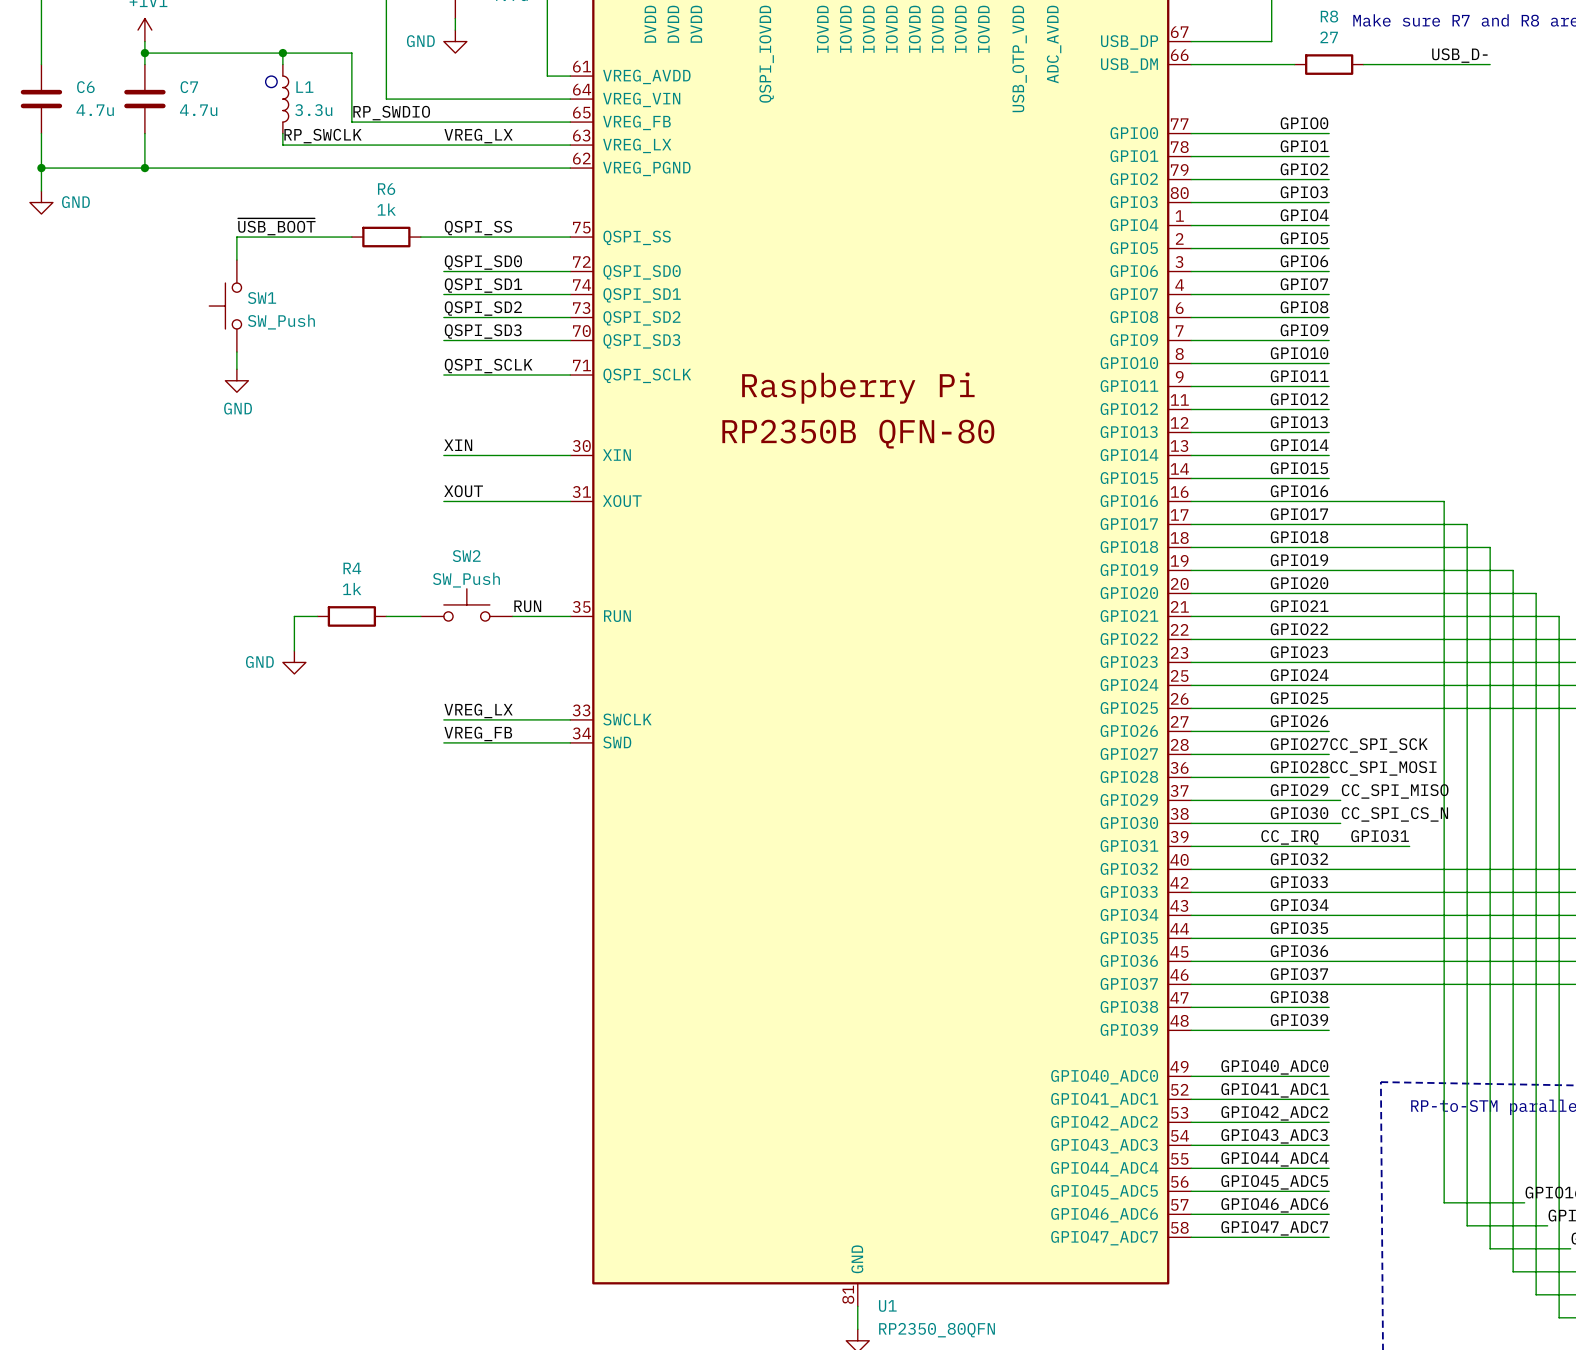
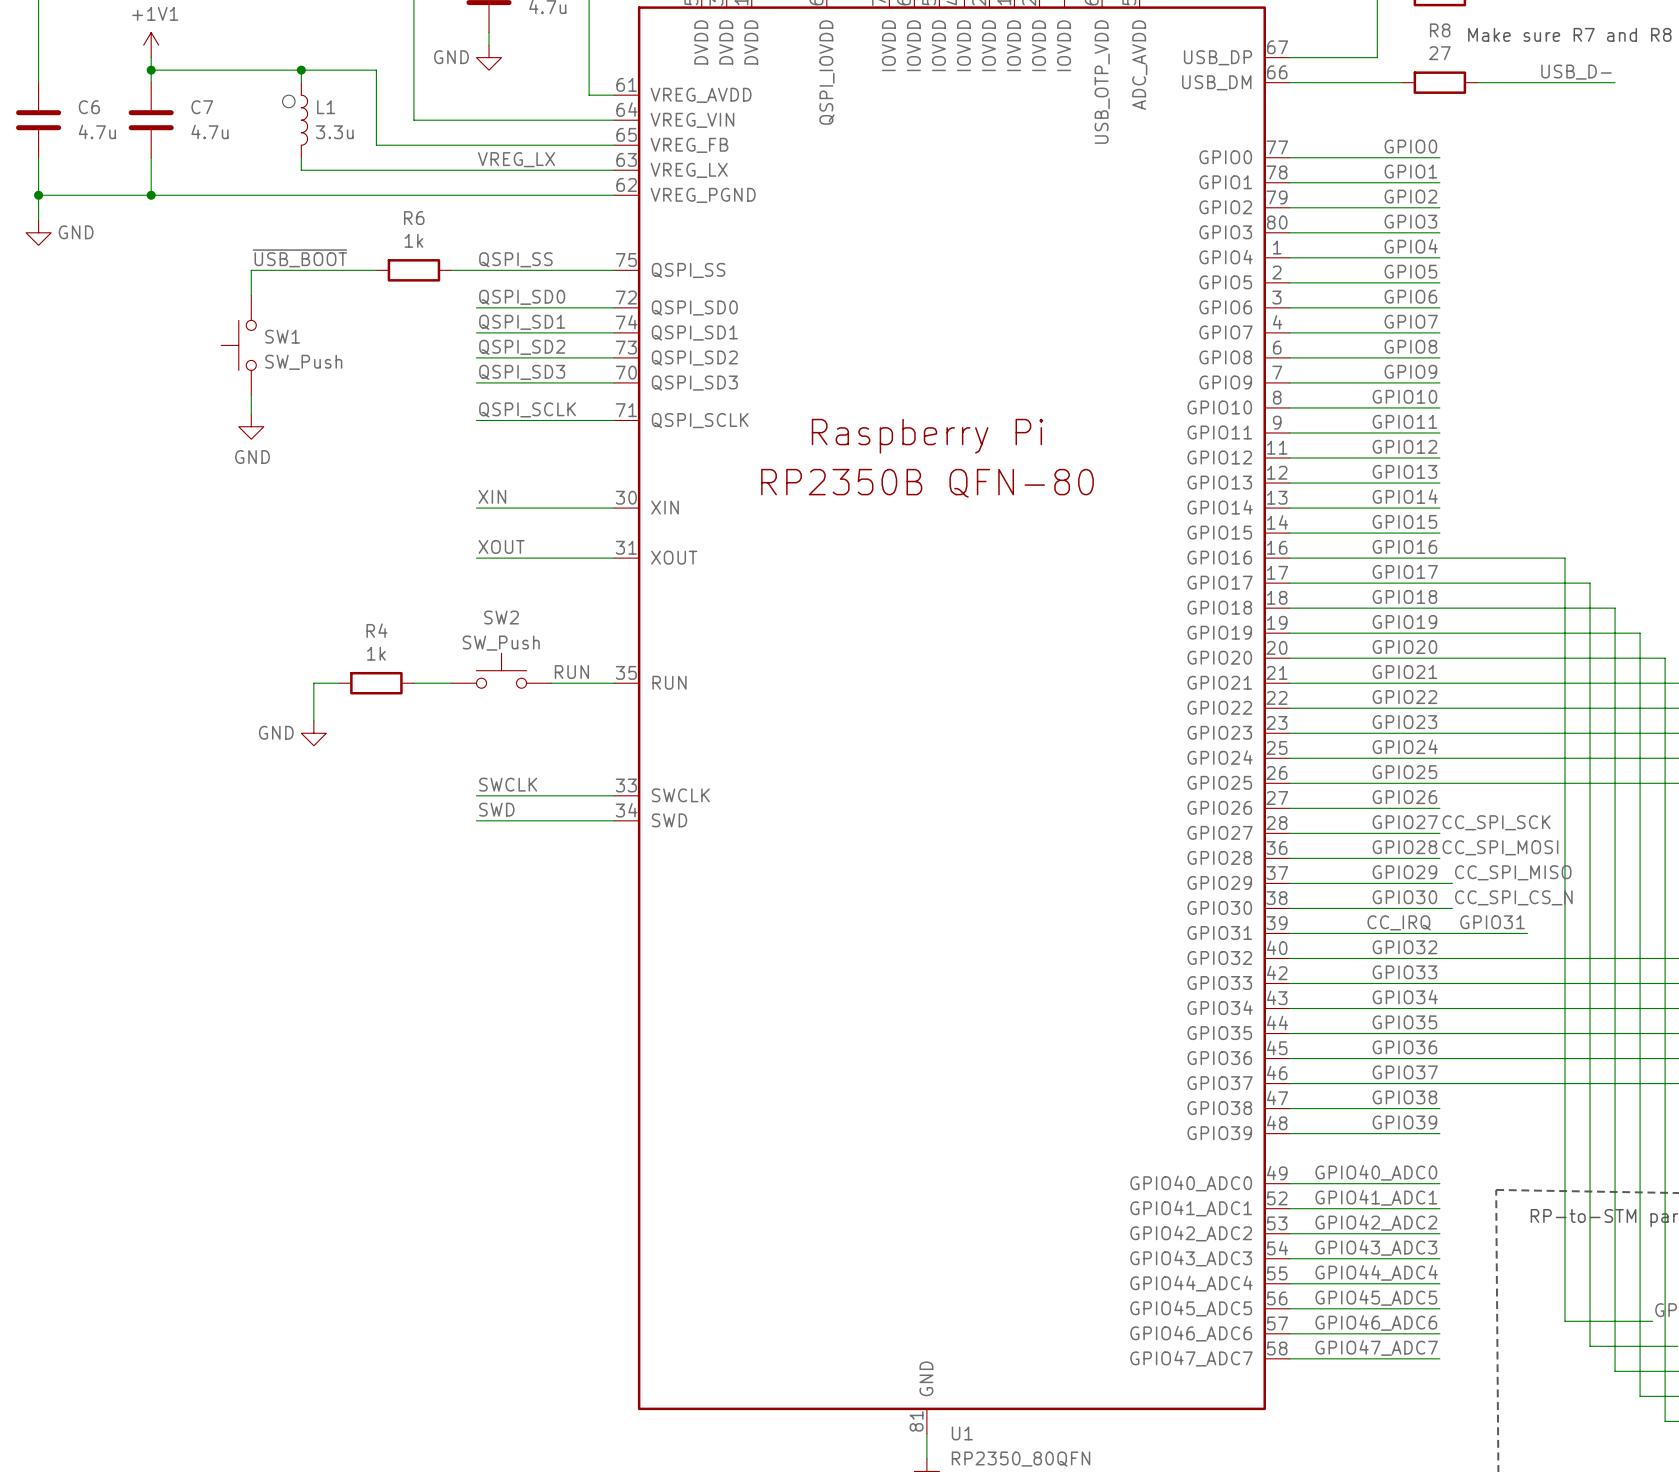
label: RP_SWDIO (391, 113) -> none
label: RP_SWCLK (322, 136) -> none
label: VREG_LX (478, 710) -> SWCLK (508, 784)
label: VREG_FB (478, 733) -> SWD (496, 809)

